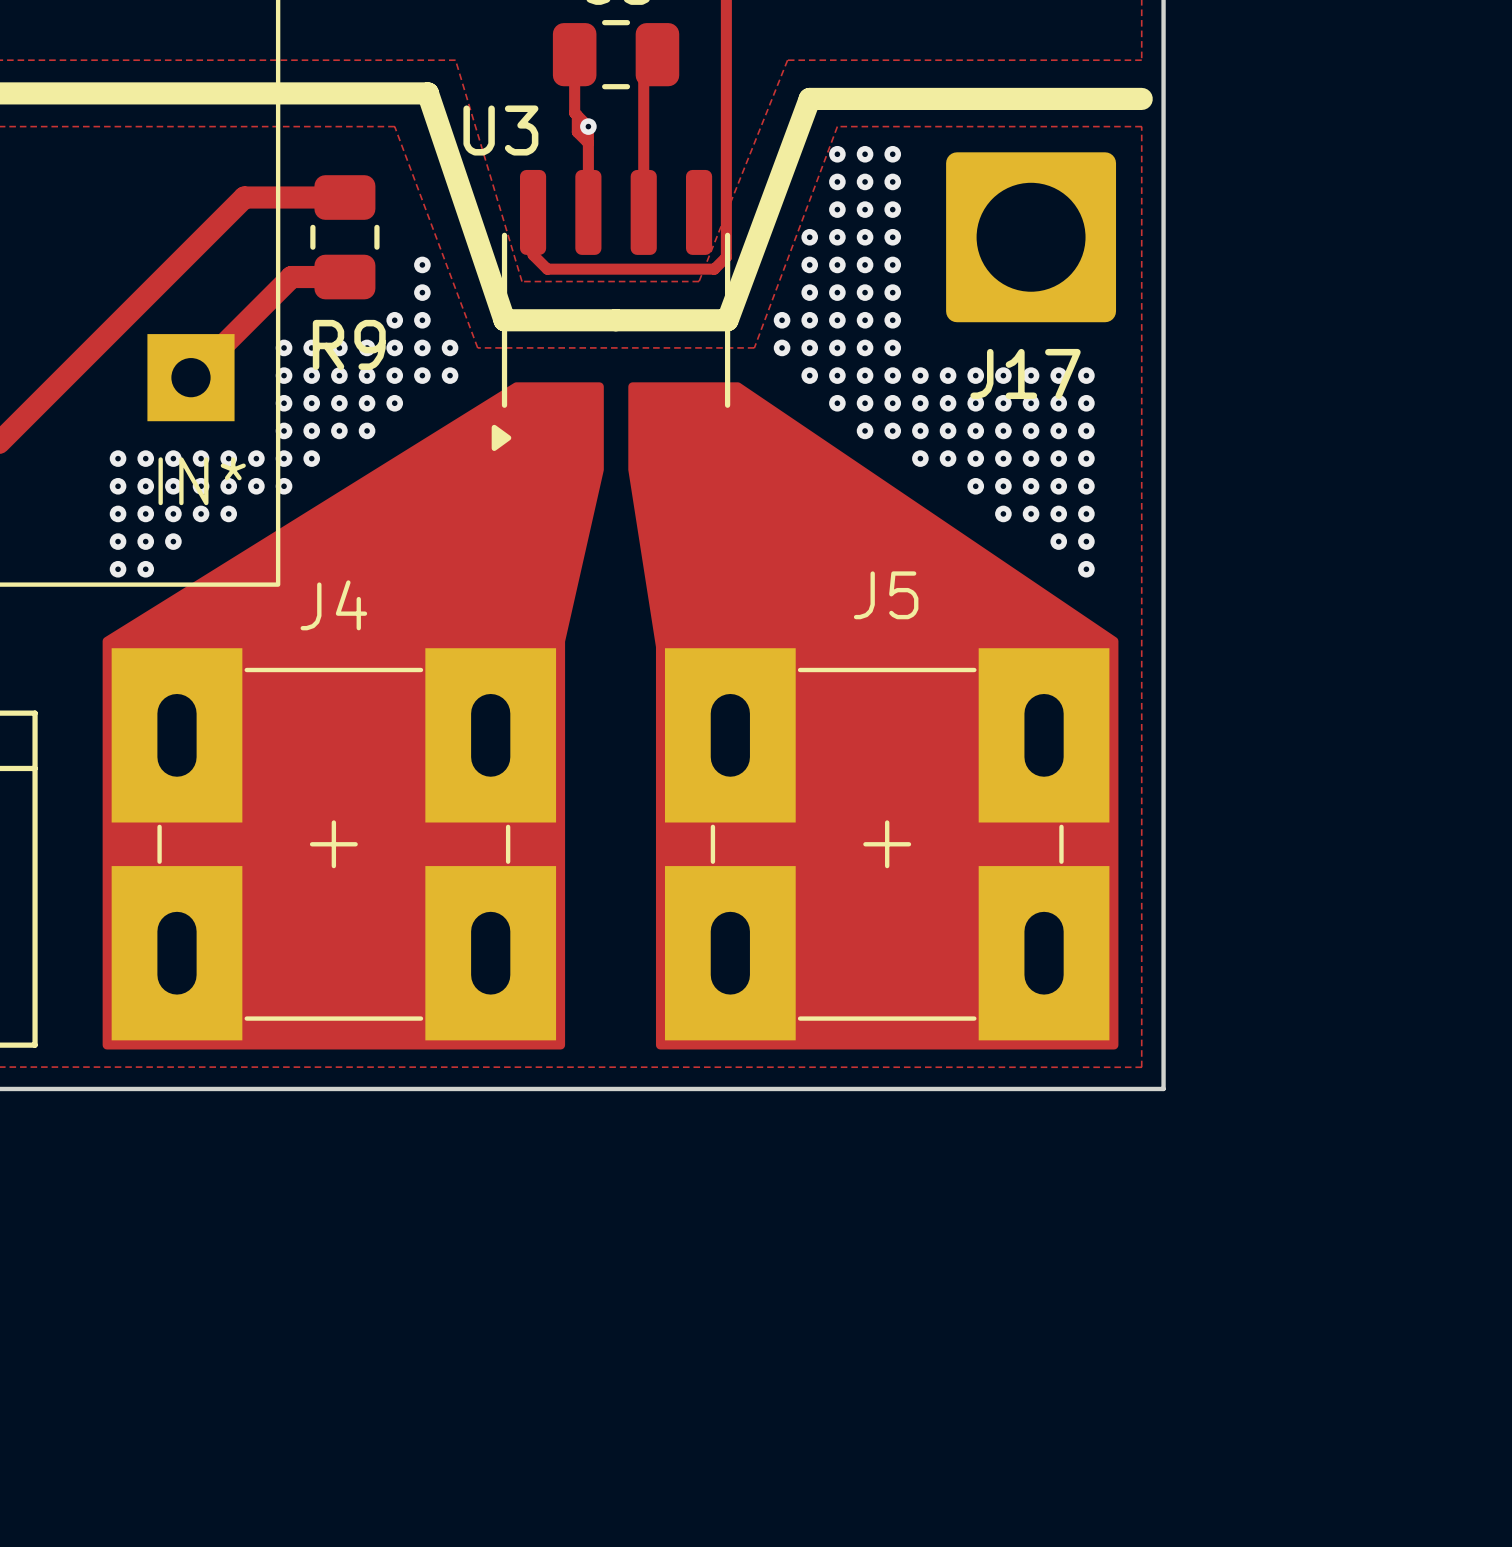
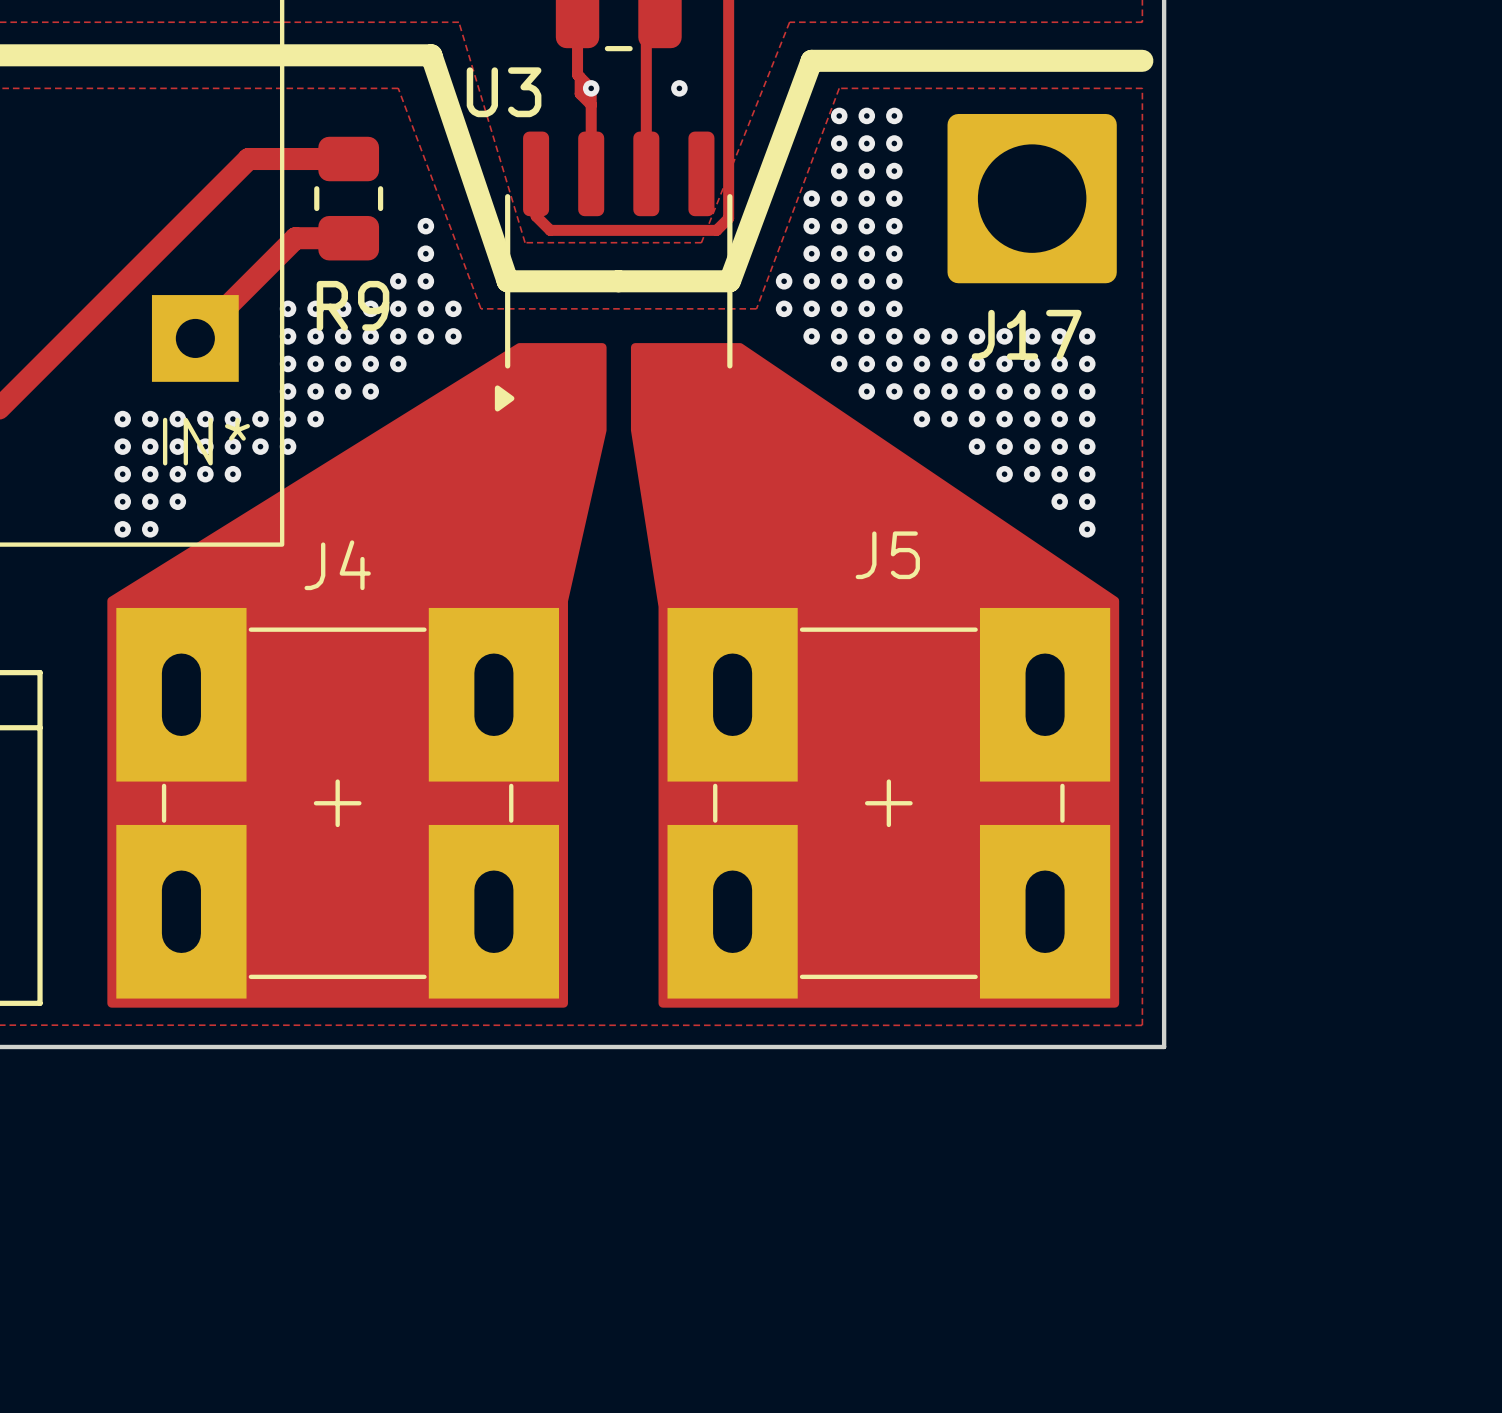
via: none -> (679, 88)

